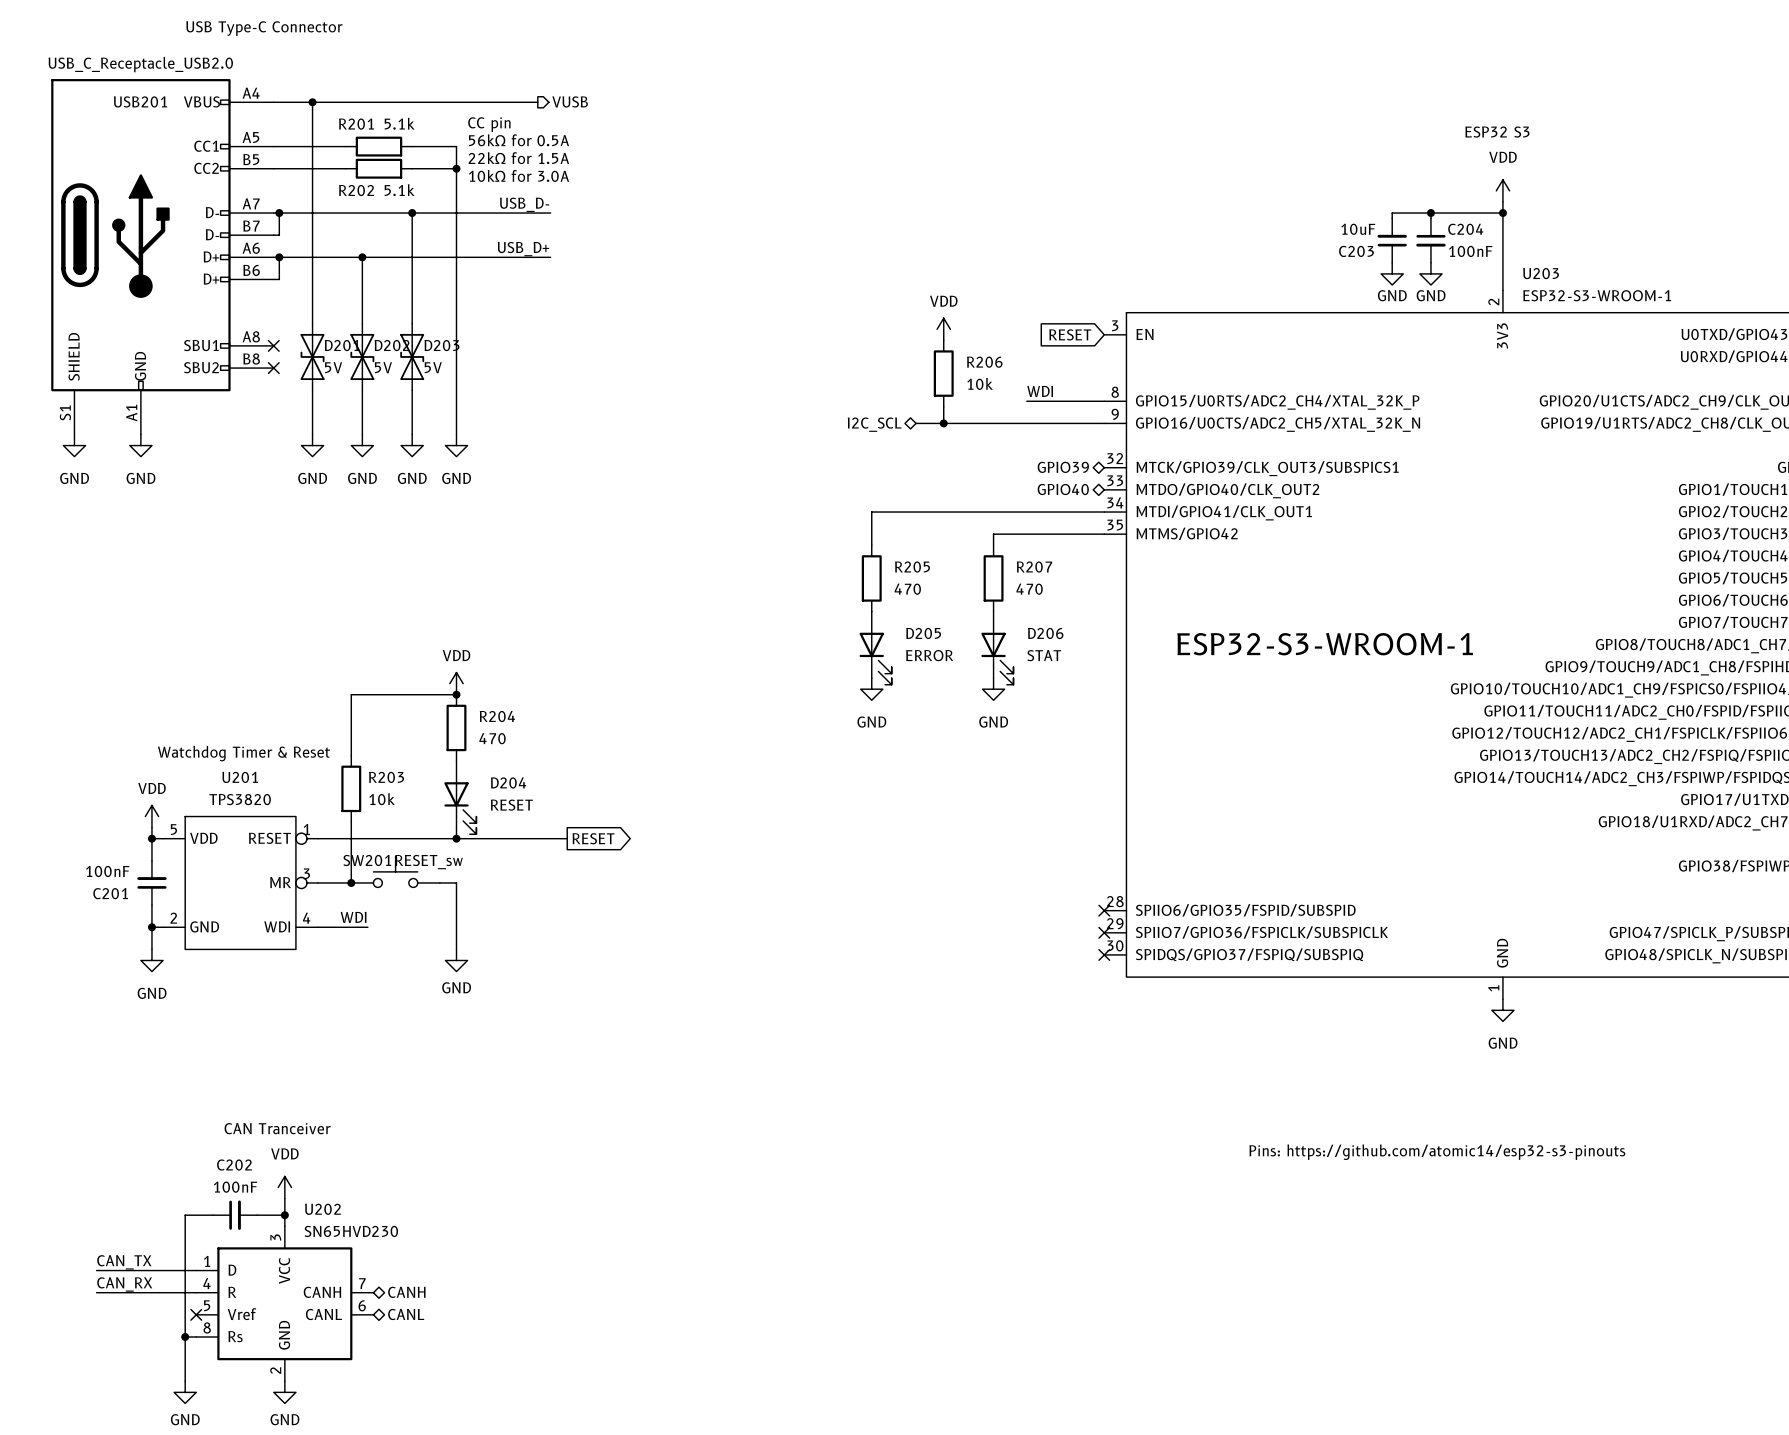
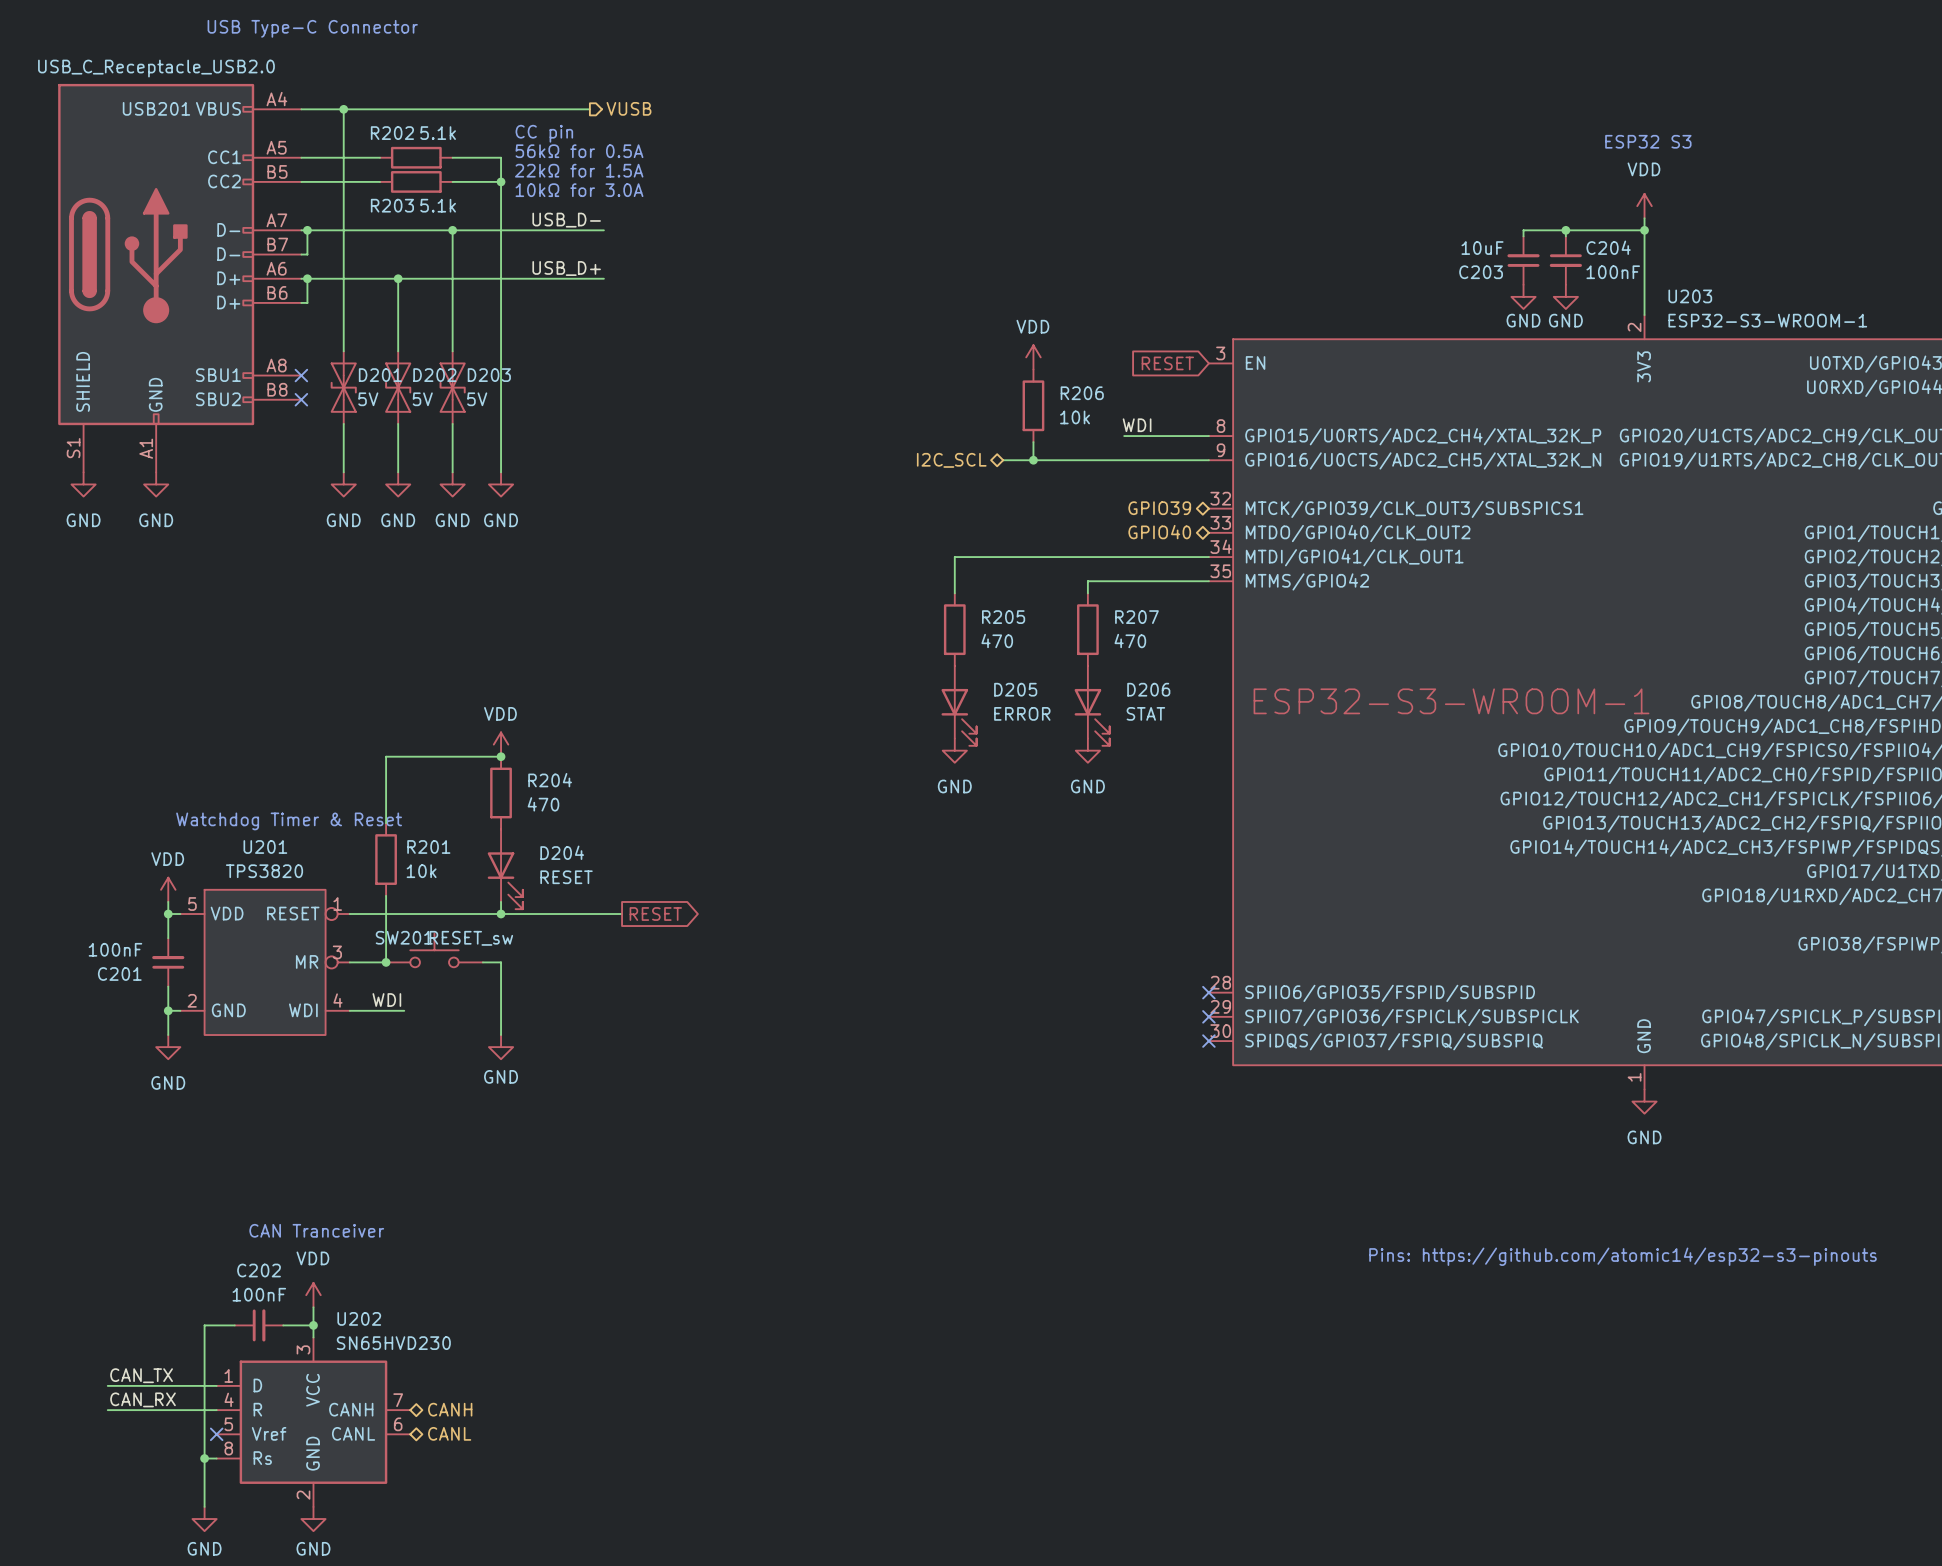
R201 name: R201 (356, 124) -> R202 (392, 133)
R202 name: R202 (356, 190) -> R203 (392, 205)
R203 name: R203 (386, 777) -> R201 (428, 847)

